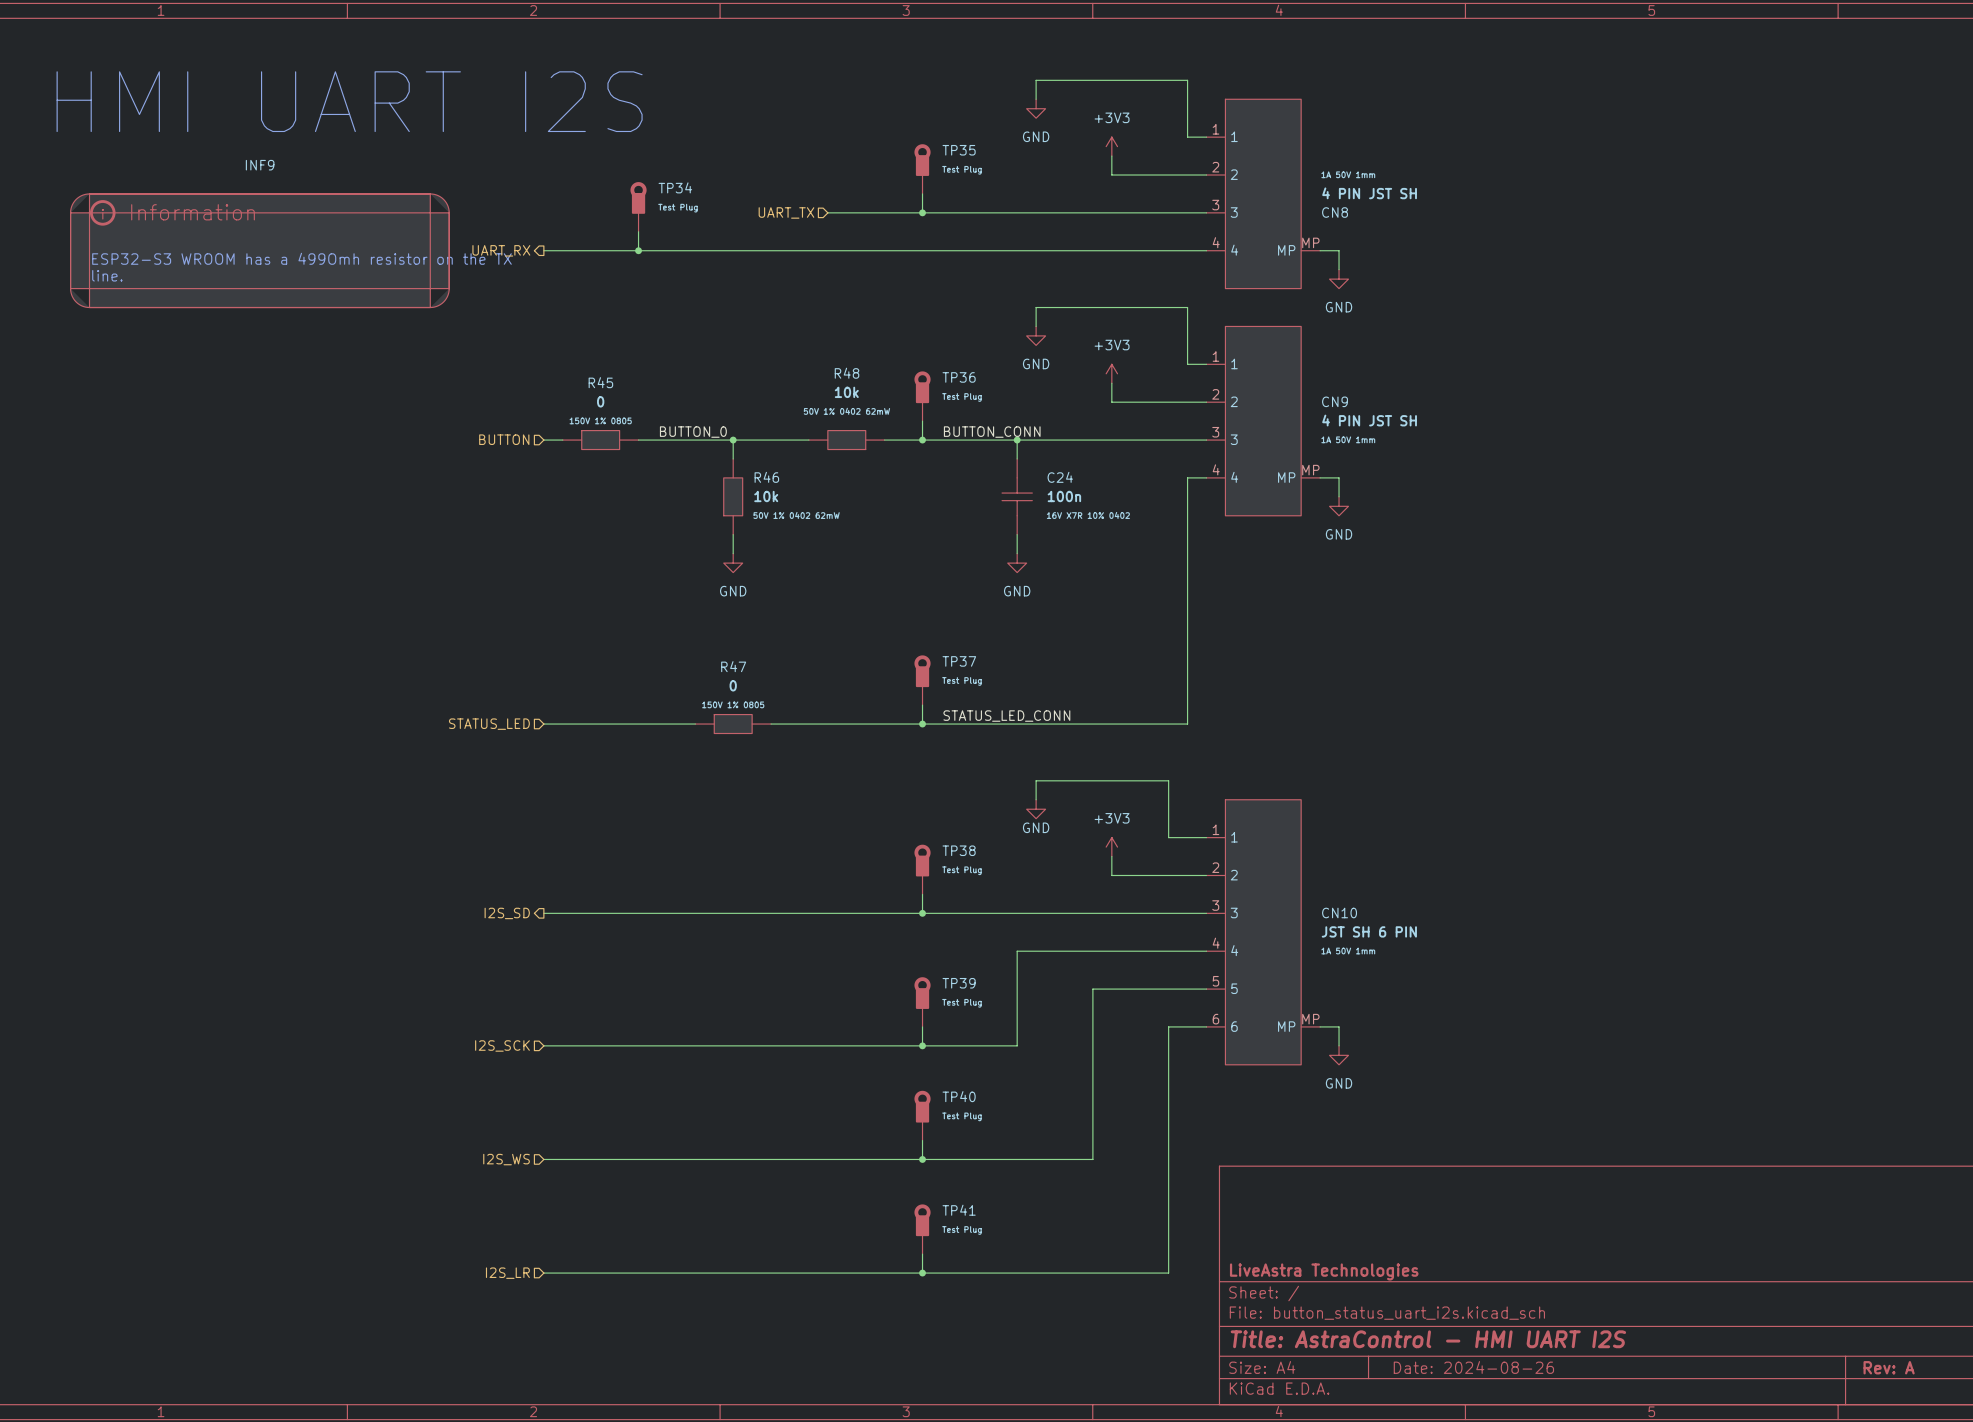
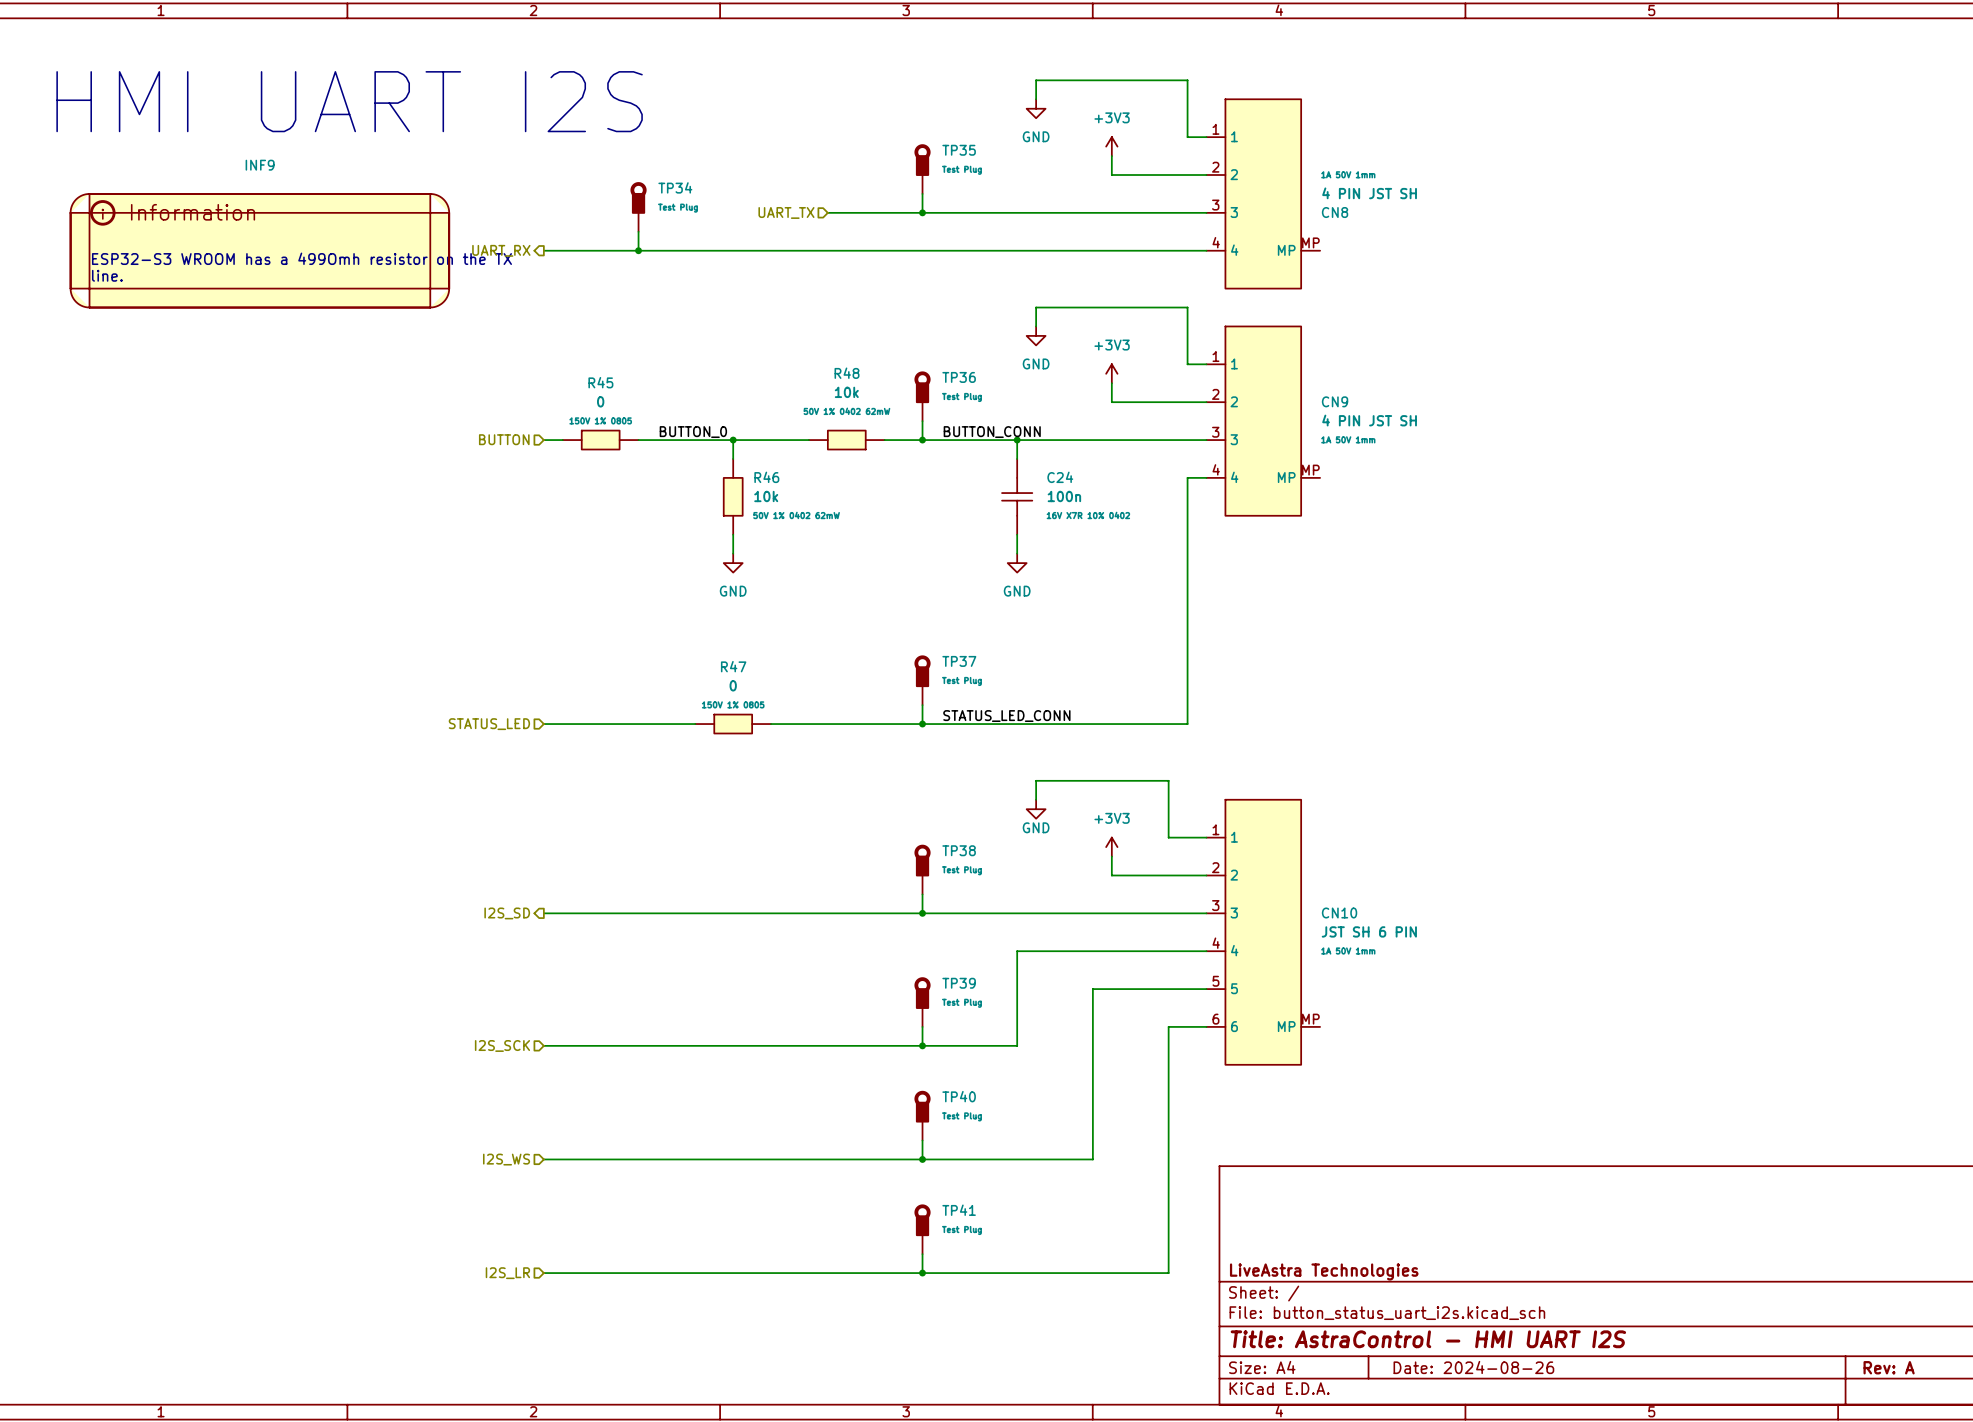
wire: (1320, 250) (1339, 250) (1339, 269) -> none
power symbol: GND (1339, 279) -> none
wire: (1320, 477) (1339, 477) (1339, 496) -> none
power symbol: GND (1339, 506) -> none
wire: (1320, 1026) (1339, 1026) (1339, 1045) -> none
power symbol: GND (1339, 1055) -> none

